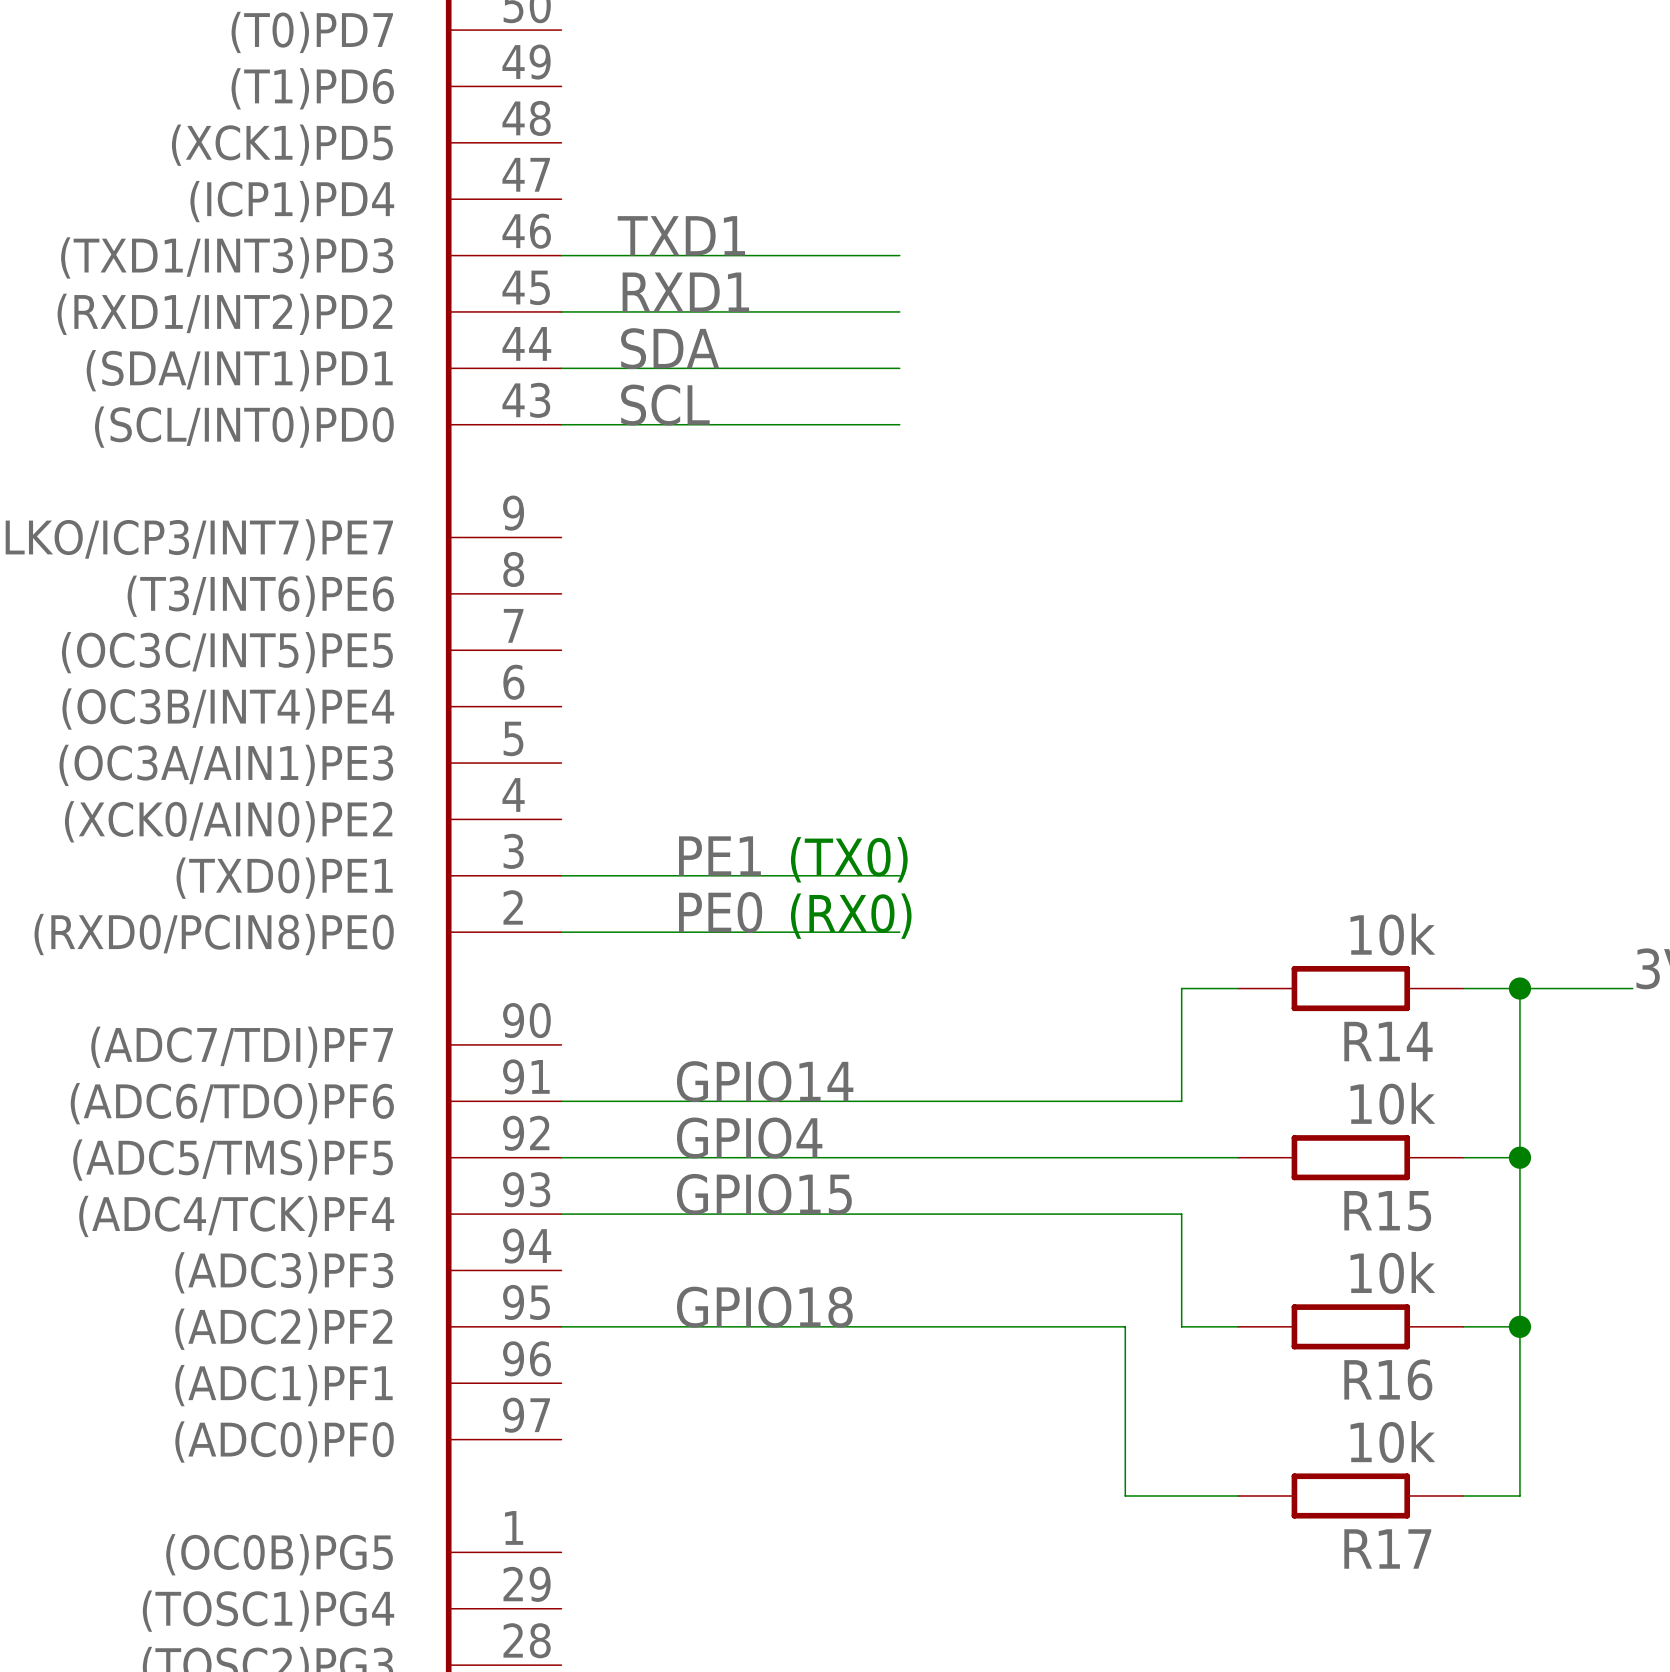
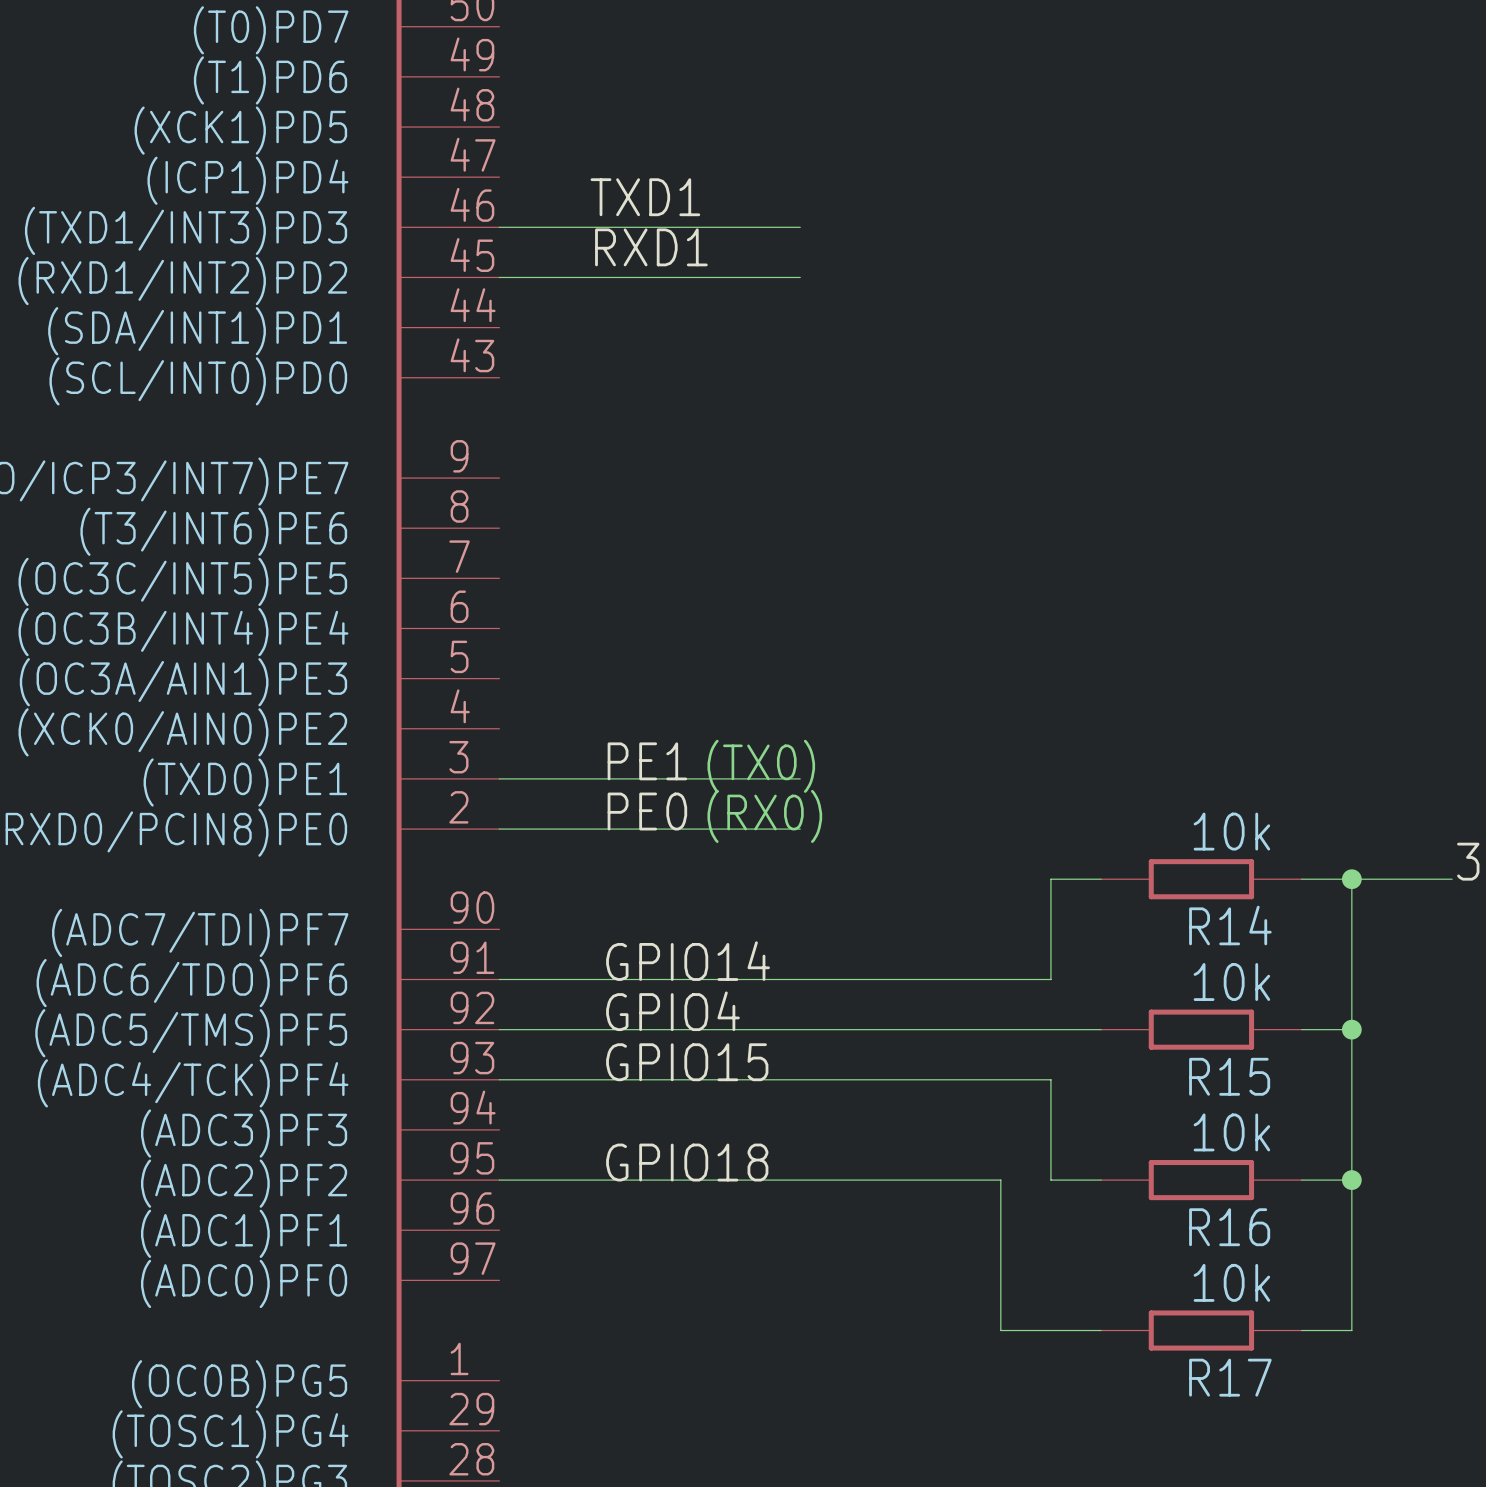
label position: TXD1 (681, 235) -> TXD1 (645, 197)
label position: RXD1 (685, 292) -> RXD1 (651, 247)
label: SDA (670, 348) -> none
wire: (561, 368) (899, 368) -> none
label: SCL (665, 405) -> none
wire: (561, 424) (899, 424) -> none

